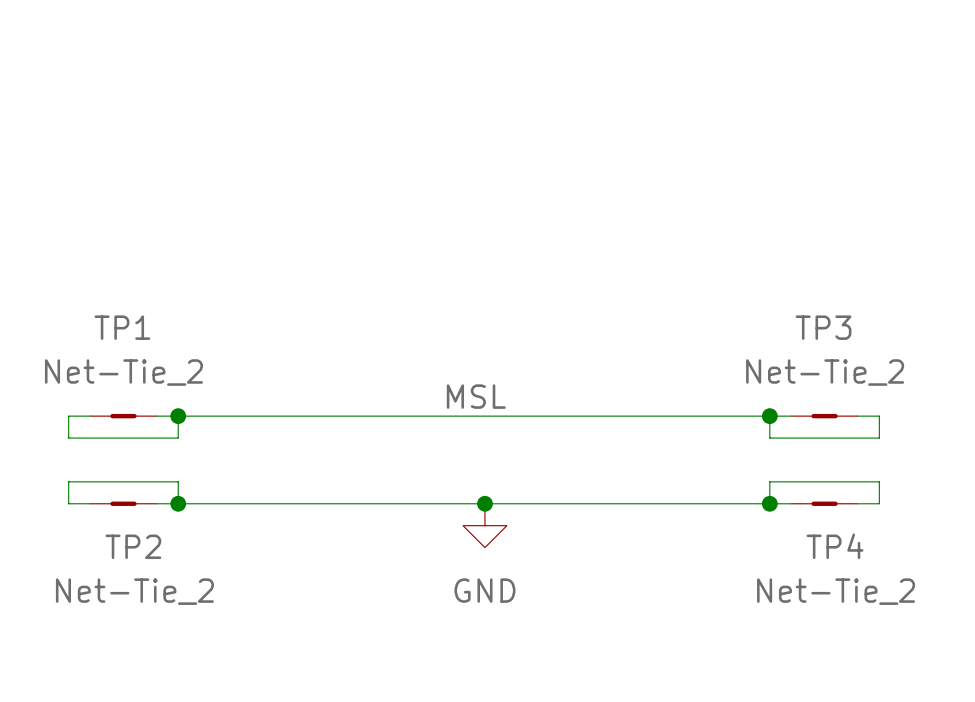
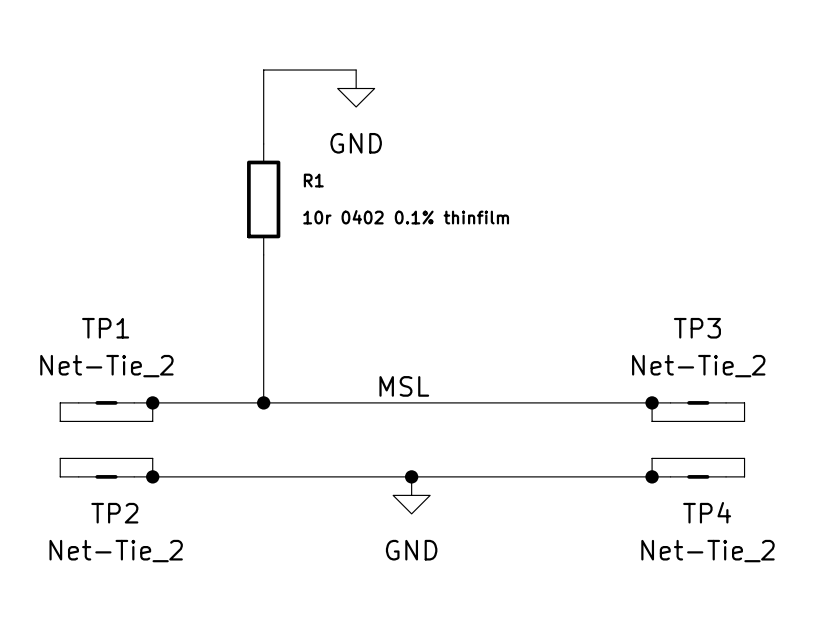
wire: none -> (356, 70) (263, 70) (263, 143)
power symbol: none -> GND (356, 88)
R1: none -> 10r 0402 0.1% thinfilm (263, 199)
wire: none -> (263, 254) (263, 402)
junction: none -> (263, 402)

